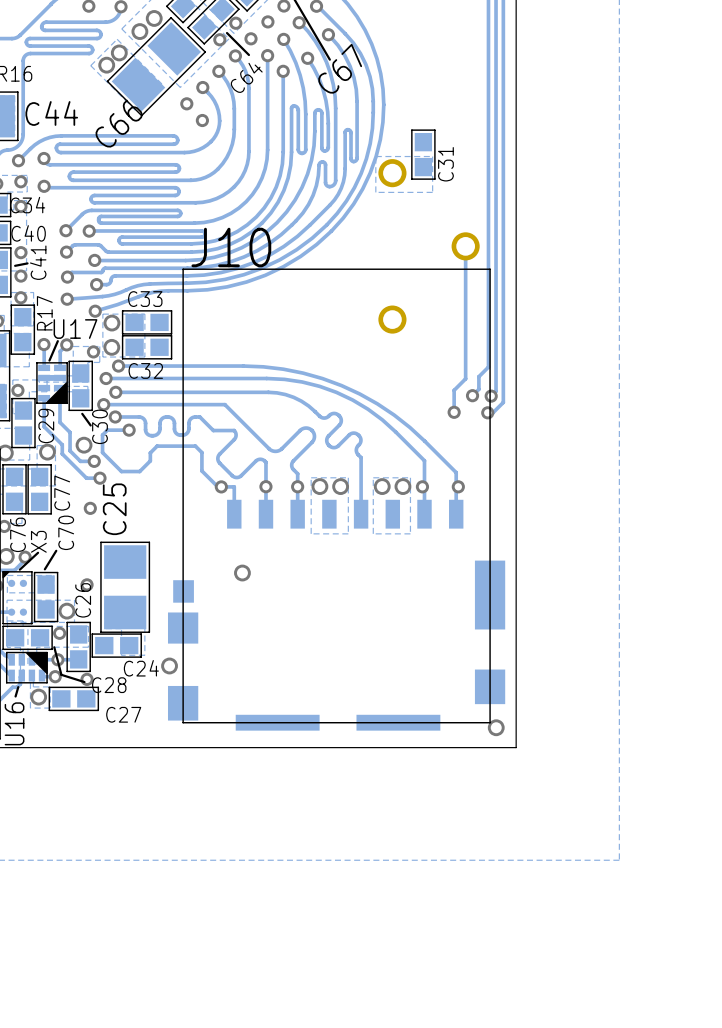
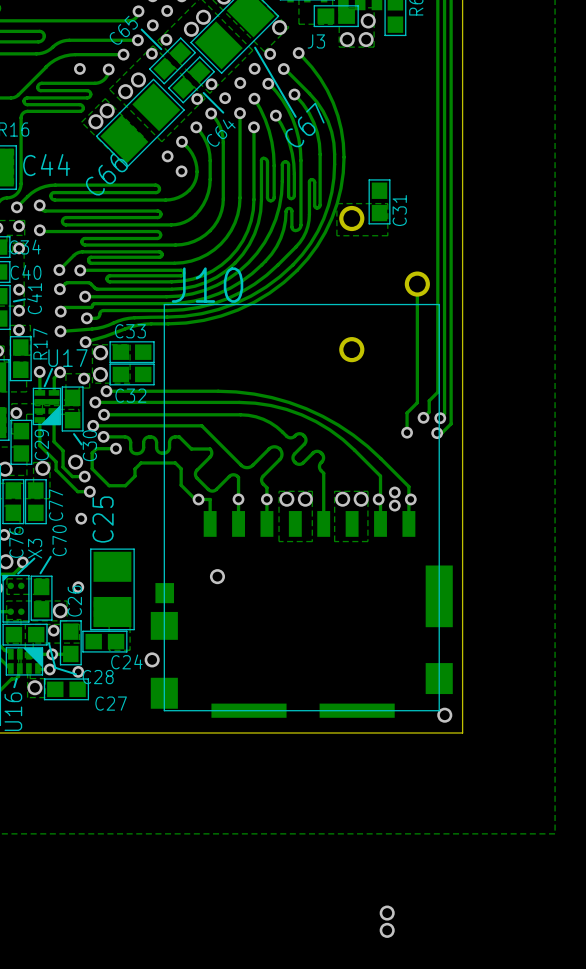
via: none -> (394, 492)
via: none -> (394, 505)
via: none -> (387, 913)
via: none -> (387, 930)

